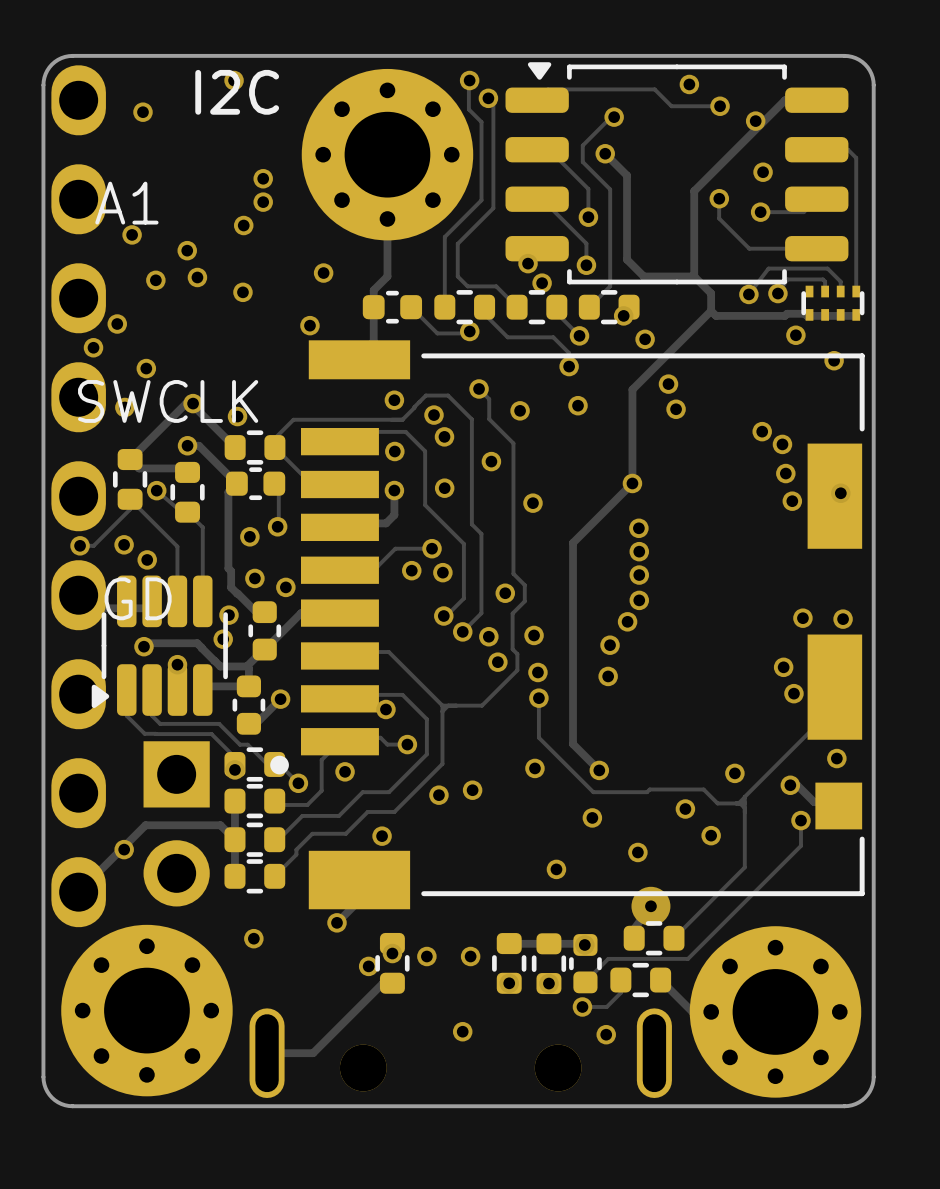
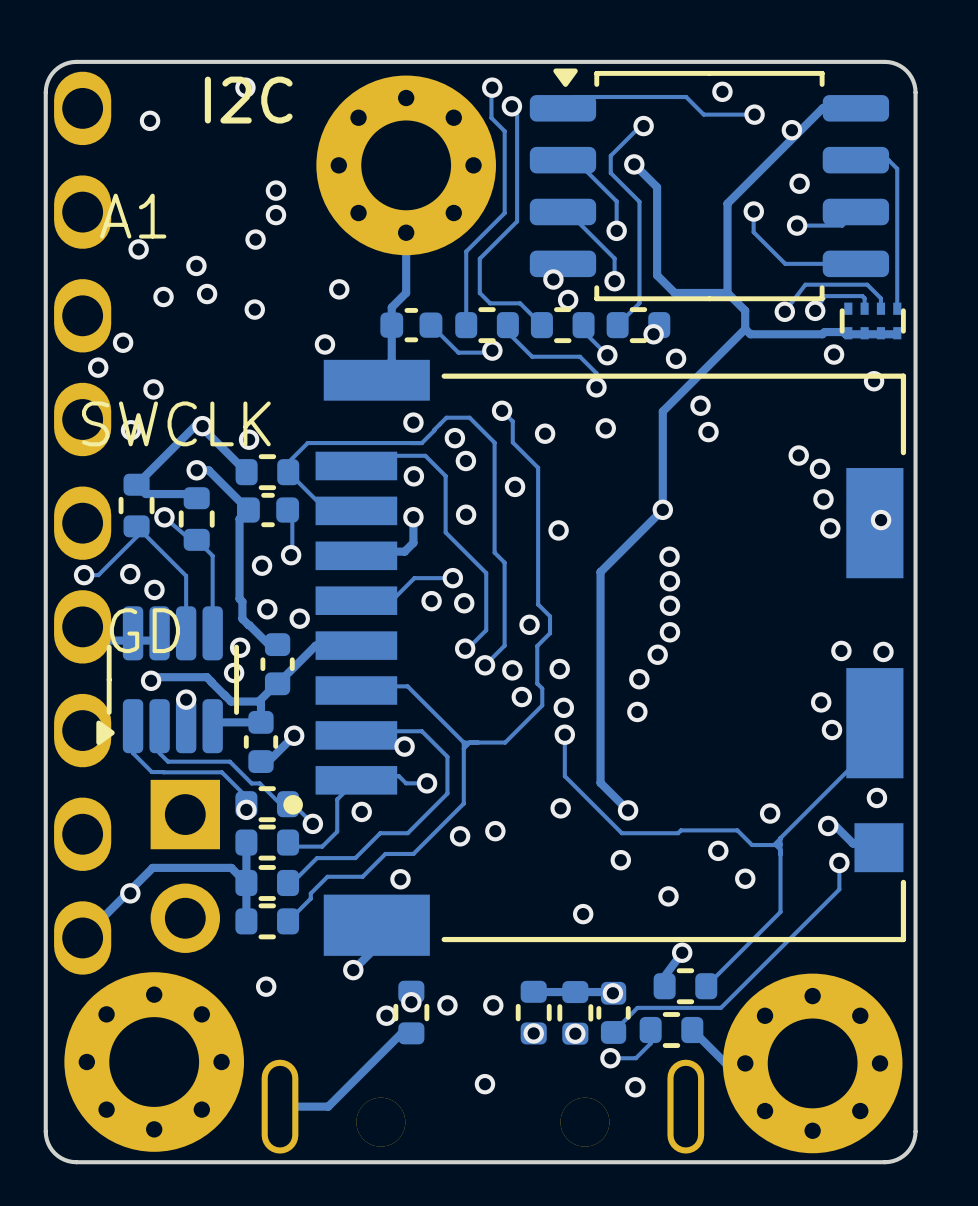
via size: [631, 886, 671, 926] -> [671, 942, 693, 963]

